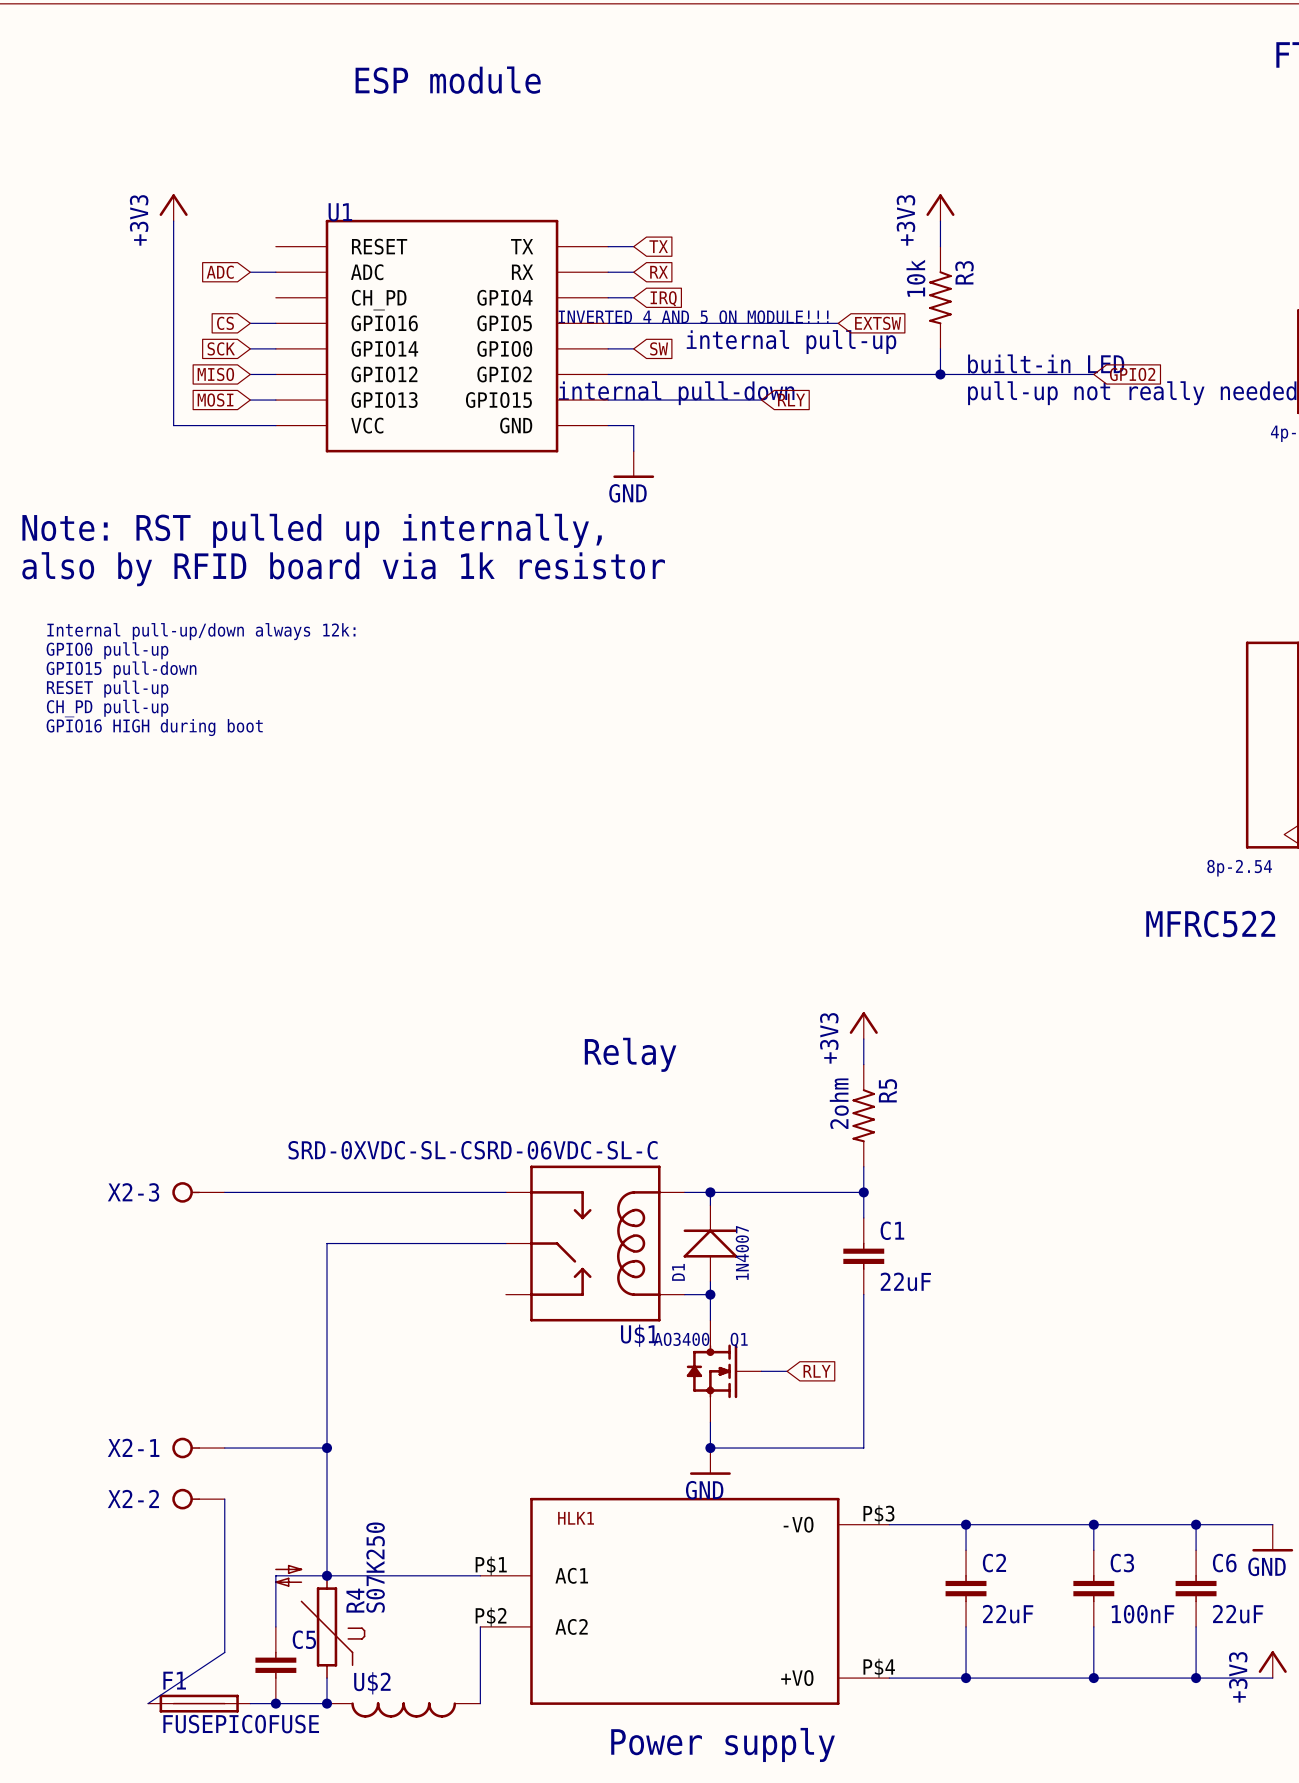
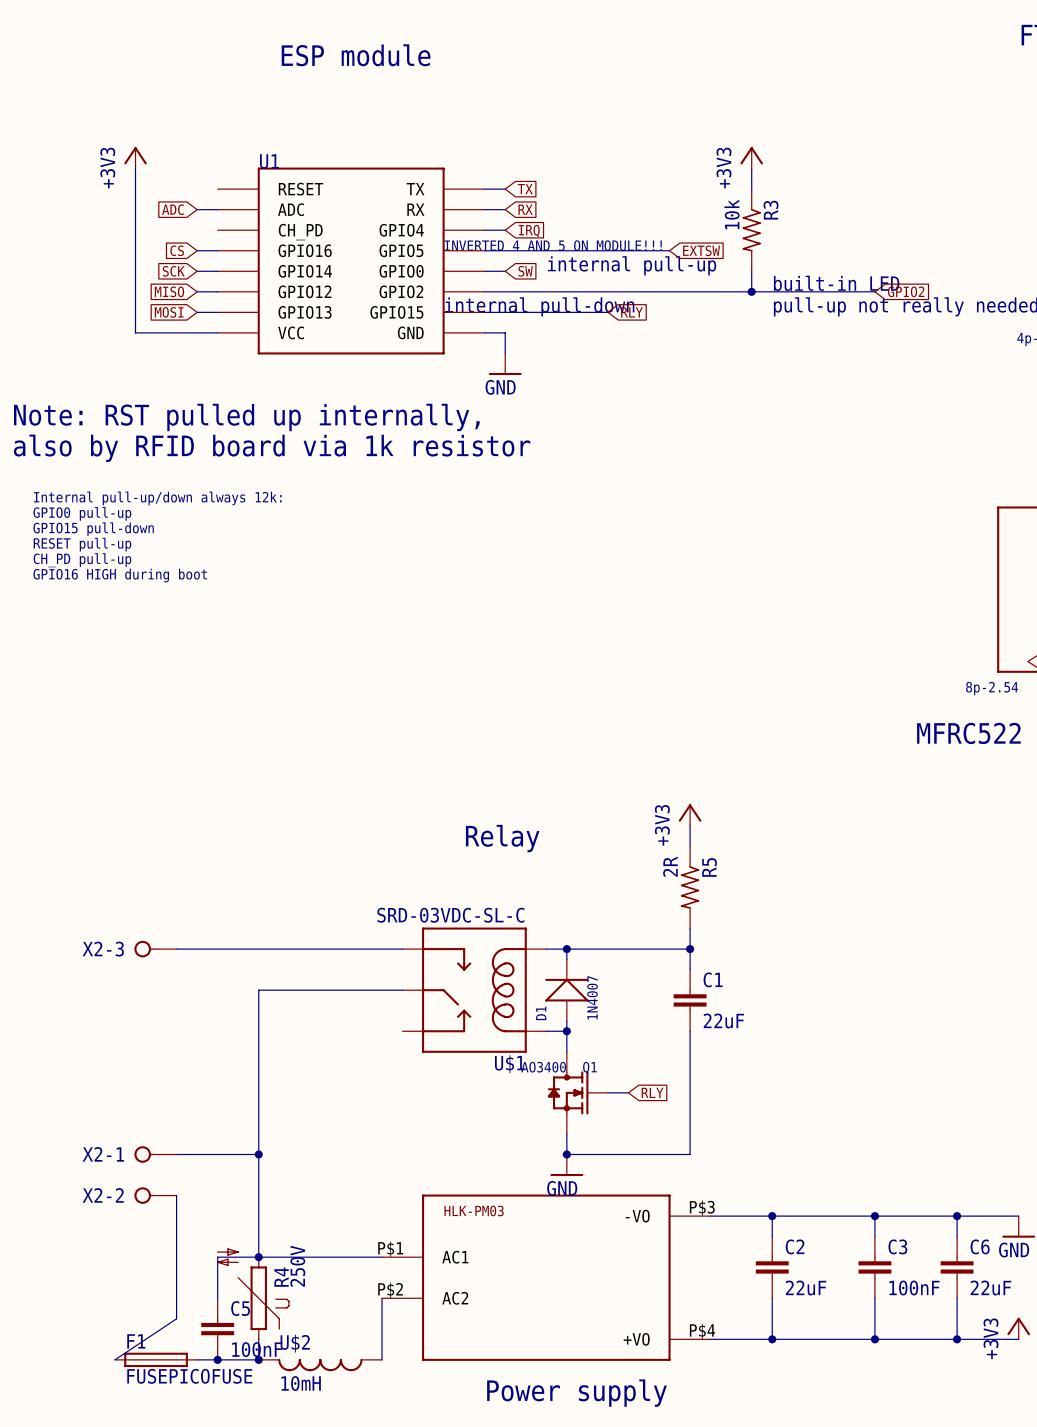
R5 value: 2ohm (839, 1103) -> 2R (670, 866)
U$1 value: SRD-0XVDC-SL-CSRD-06VDC-SL-C (473, 1150) -> SRD-03VDC-SL-C (450, 915)
HLK1 name: HLK1 (576, 1518) -> HLK-PM03 (474, 1210)
R4 value: S07K250 (375, 1567) -> 250V (297, 1266)
C5 value: none -> 100nF (257, 1349)
U$2 value: none -> 10mH (301, 1383)

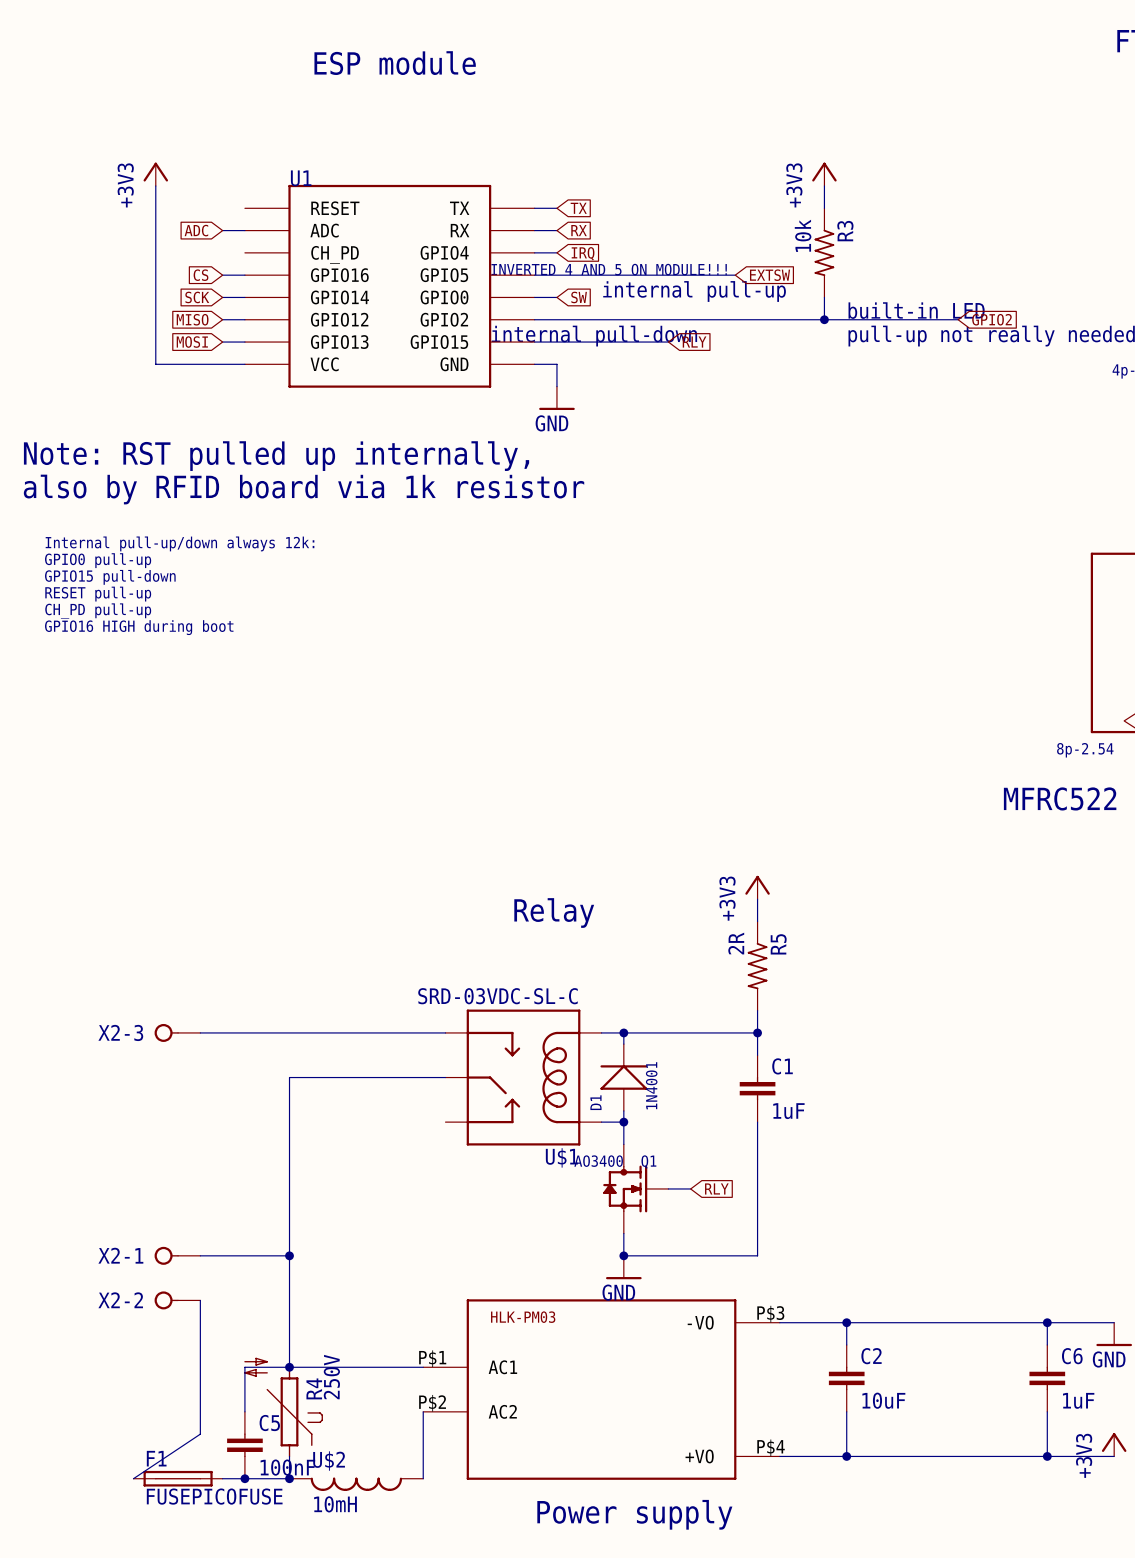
D1 value: 1N4007 (592, 997) -> 1N4001 (651, 1085)
C1 value: 22uF (723, 1020) -> 1uF (788, 1111)
wire: (874, 1216) (874, 1236) -> none
junction: (874, 1216) -> none
C3: 100nF (874, 1267) -> none
C2 value: 22uF (806, 1288) -> 10uF (883, 1400)
C6 value: 22uF (990, 1288) -> 1uF (1078, 1400)
wire: (874, 1298) (874, 1339) -> none
junction: (874, 1339) -> none

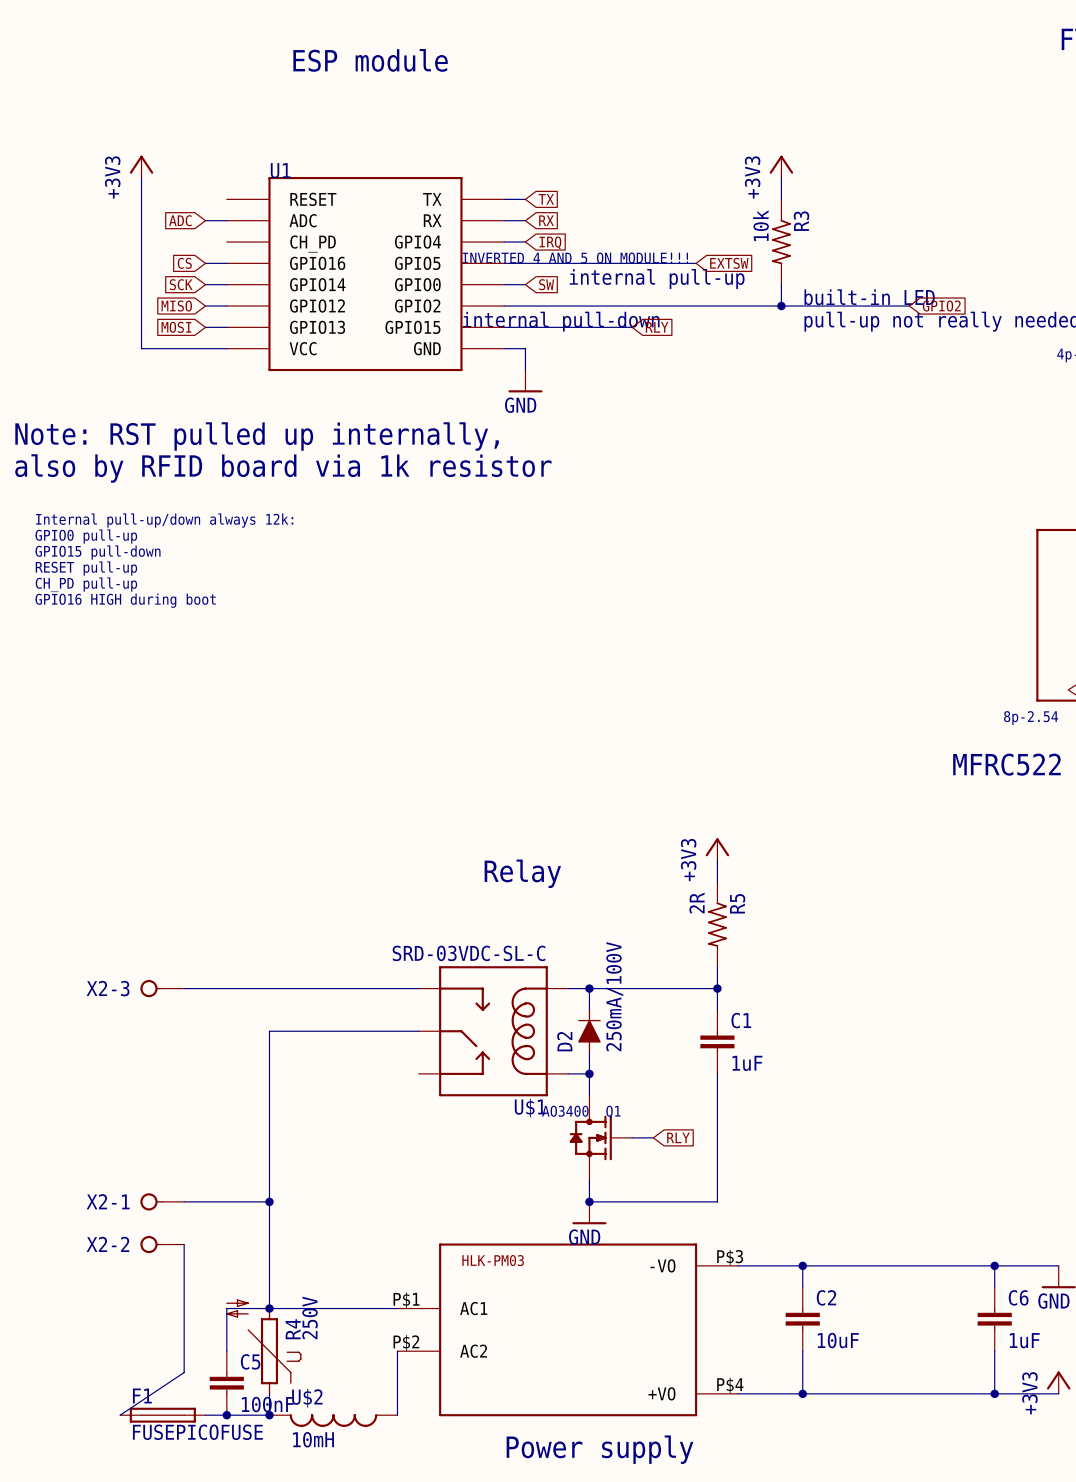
D1: 1N4001 (623, 1077) -> none
D2: none -> 250mA/100V (589, 1031)

